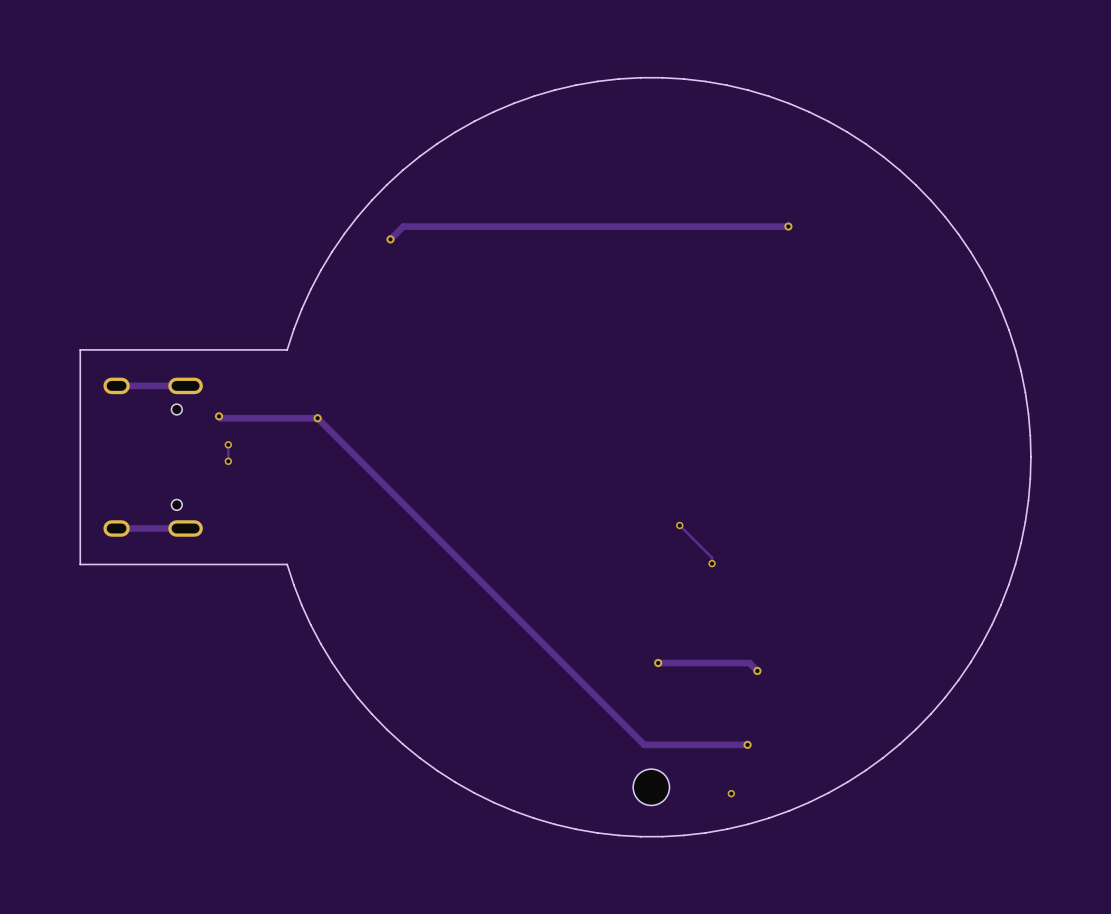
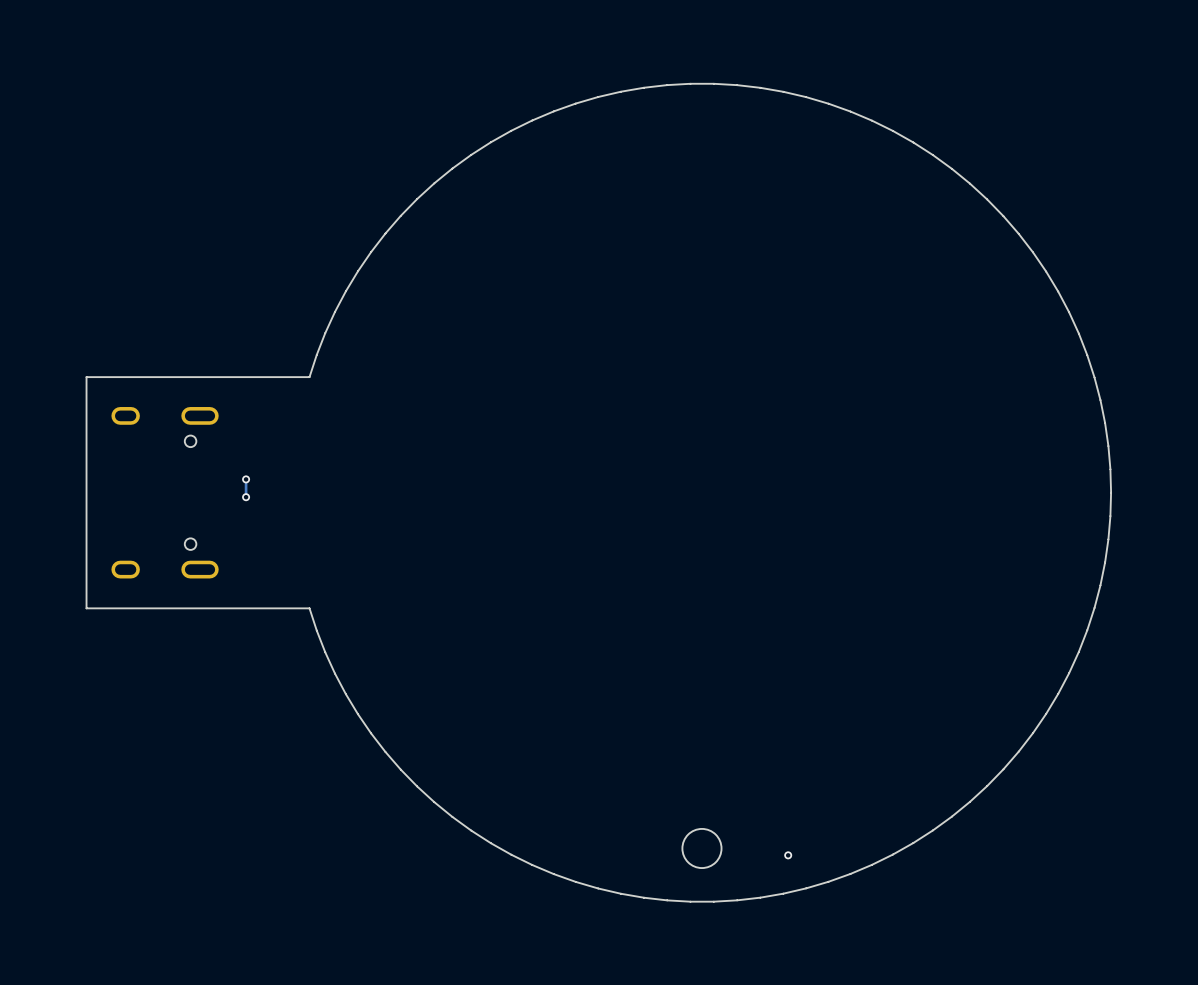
track: (788, 226) (403, 226) (390, 239) -> none
via: (788, 226) -> none
via: (390, 239) -> none
track: (185, 385) (116, 385) -> none
track: (219, 416) (220, 418) (317, 418) (644, 744) (747, 744) -> none
via: (219, 416) -> none
via: (317, 418) -> none
track: (679, 525) (712, 557) (712, 563) -> none
via: (679, 525) -> none
track: (185, 528) (116, 528) -> none
via: (712, 563) -> none
track: (658, 663) (749, 663) (757, 670) -> none
via: (658, 663) -> none
via: (757, 670) -> none
via: (747, 744) -> none

